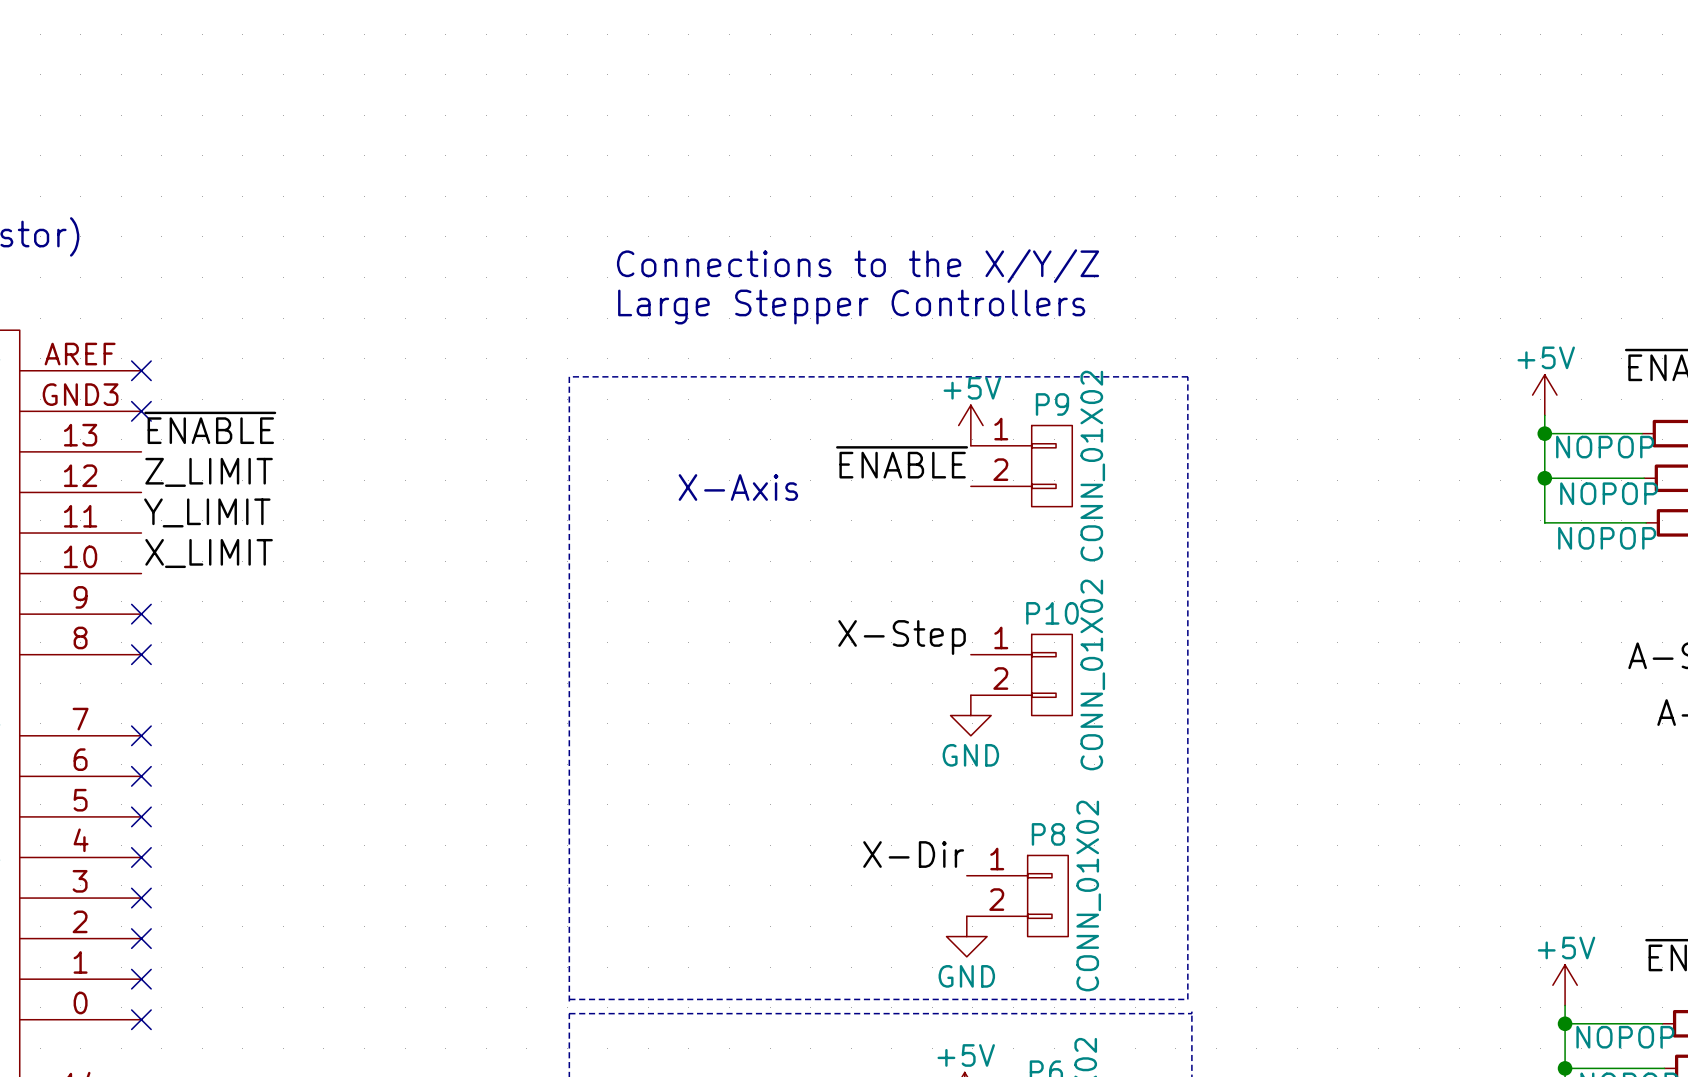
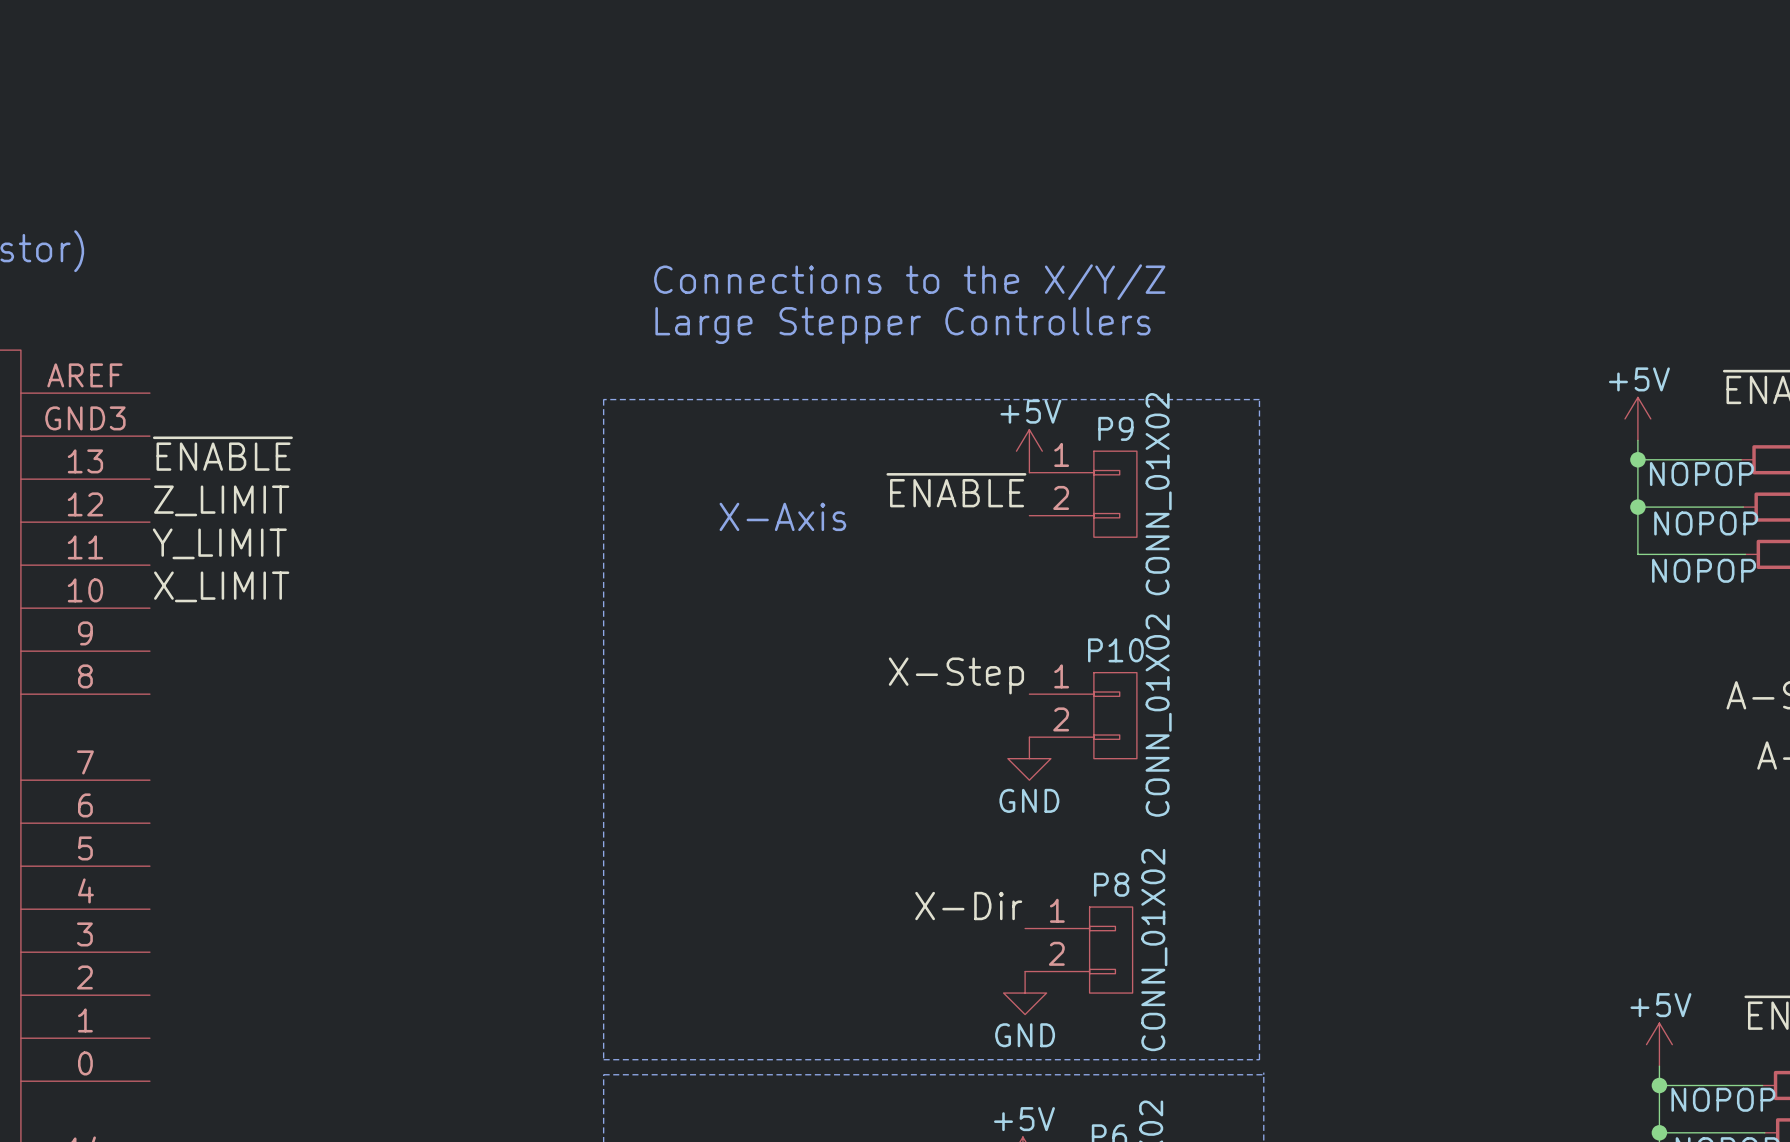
no-connect mark: (141, 370) -> none
no-connect mark: (141, 411) -> none
no-connect mark: (141, 614) -> none
no-connect mark: (141, 654) -> none
no-connect mark: (141, 735) -> none
no-connect mark: (141, 776) -> none
no-connect mark: (141, 816) -> none
no-connect mark: (141, 857) -> none
no-connect mark: (141, 898) -> none
no-connect mark: (141, 938) -> none
no-connect mark: (141, 979) -> none
no-connect mark: (141, 1019) -> none

